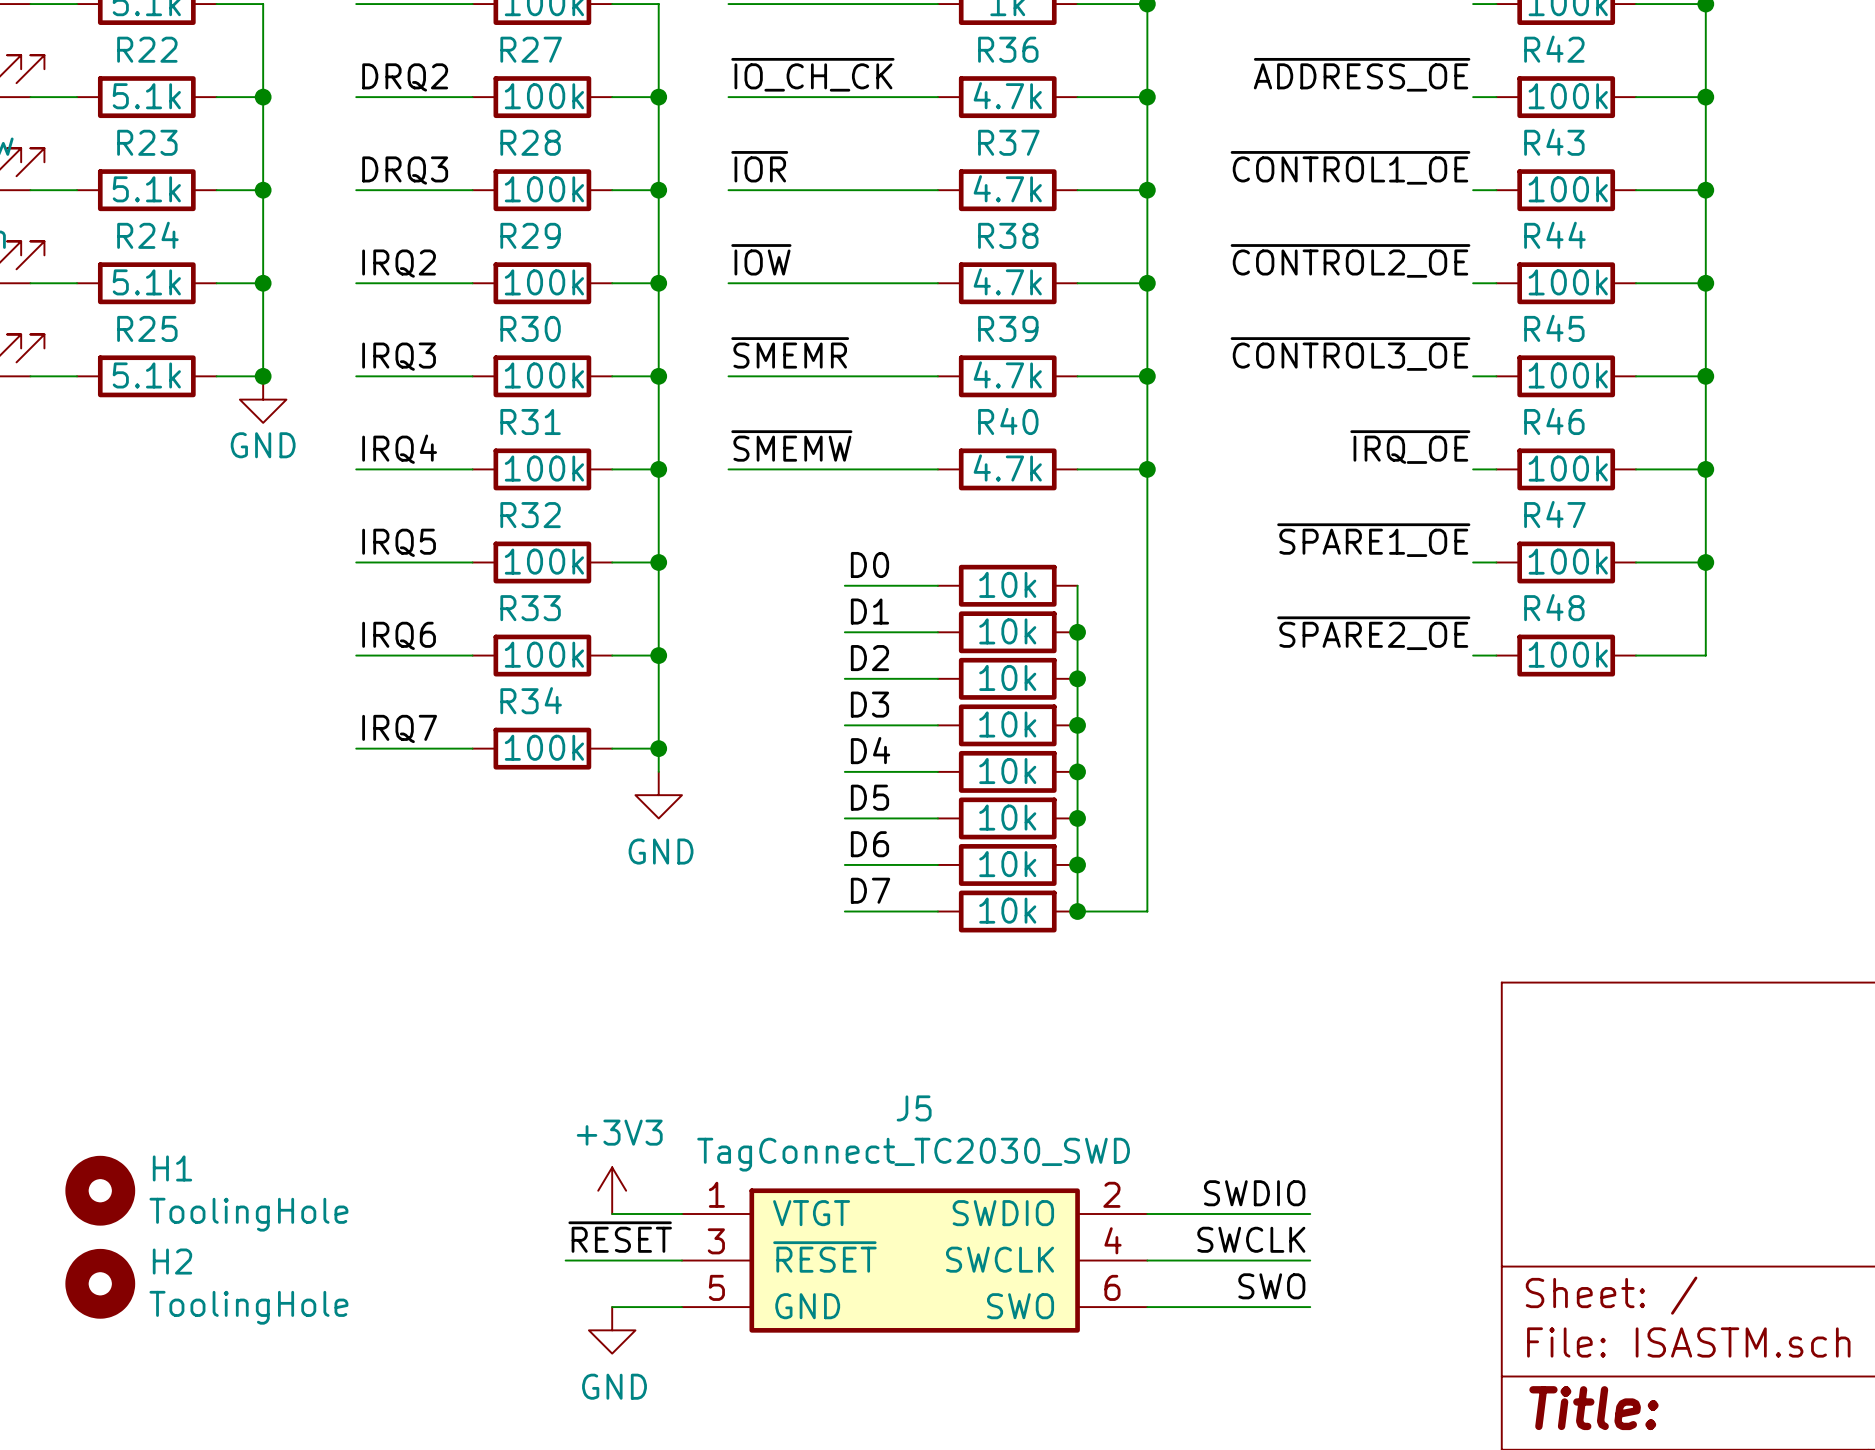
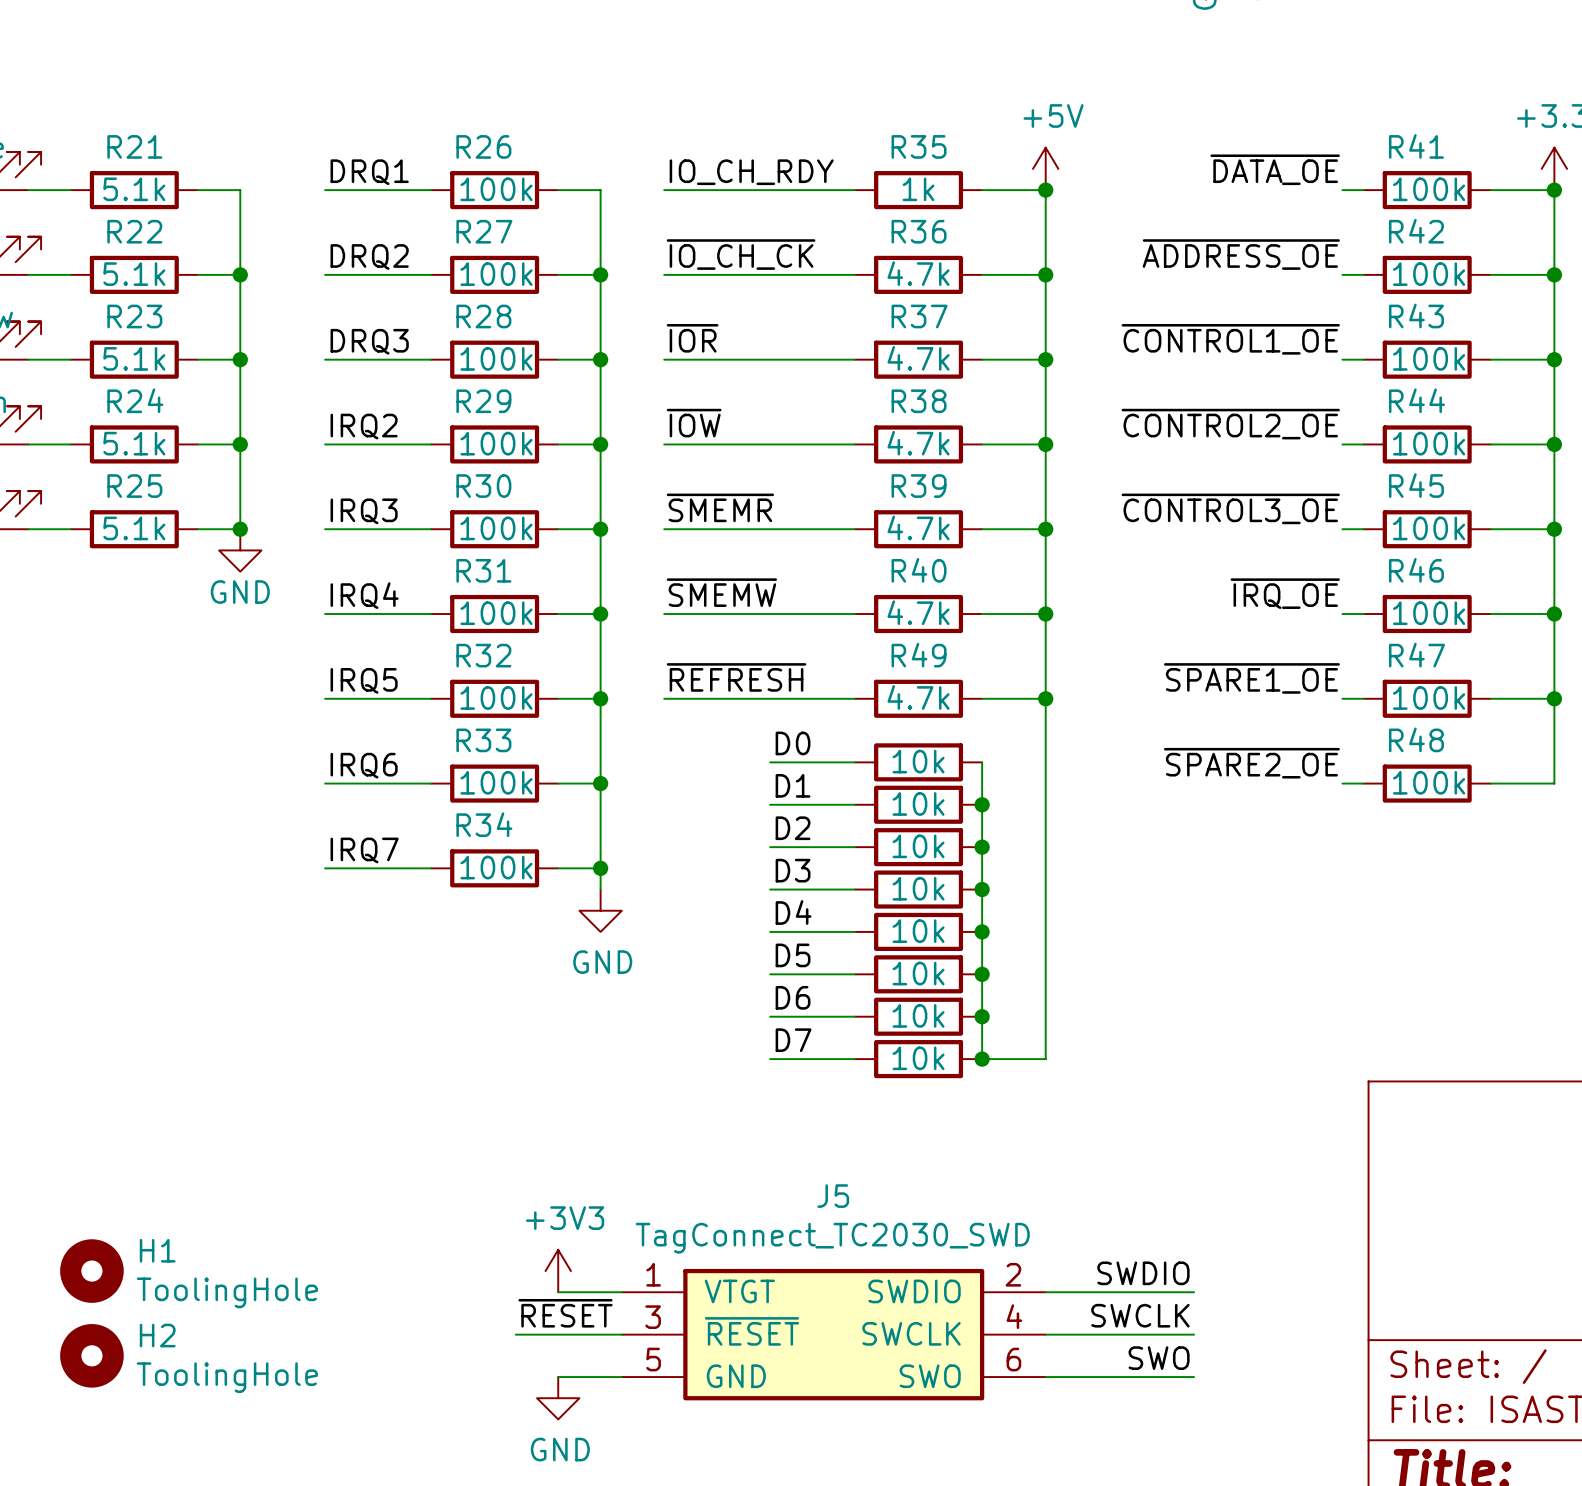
label: none -> ~{REFRESH} (736, 677)
wire: none -> (664, 698) (854, 698)
R49: none -> 4.7k (918, 698)
wire: none -> (982, 698) (1045, 698)
label: D0 (869, 564) -> none
wire: (844, 585) (937, 585) -> (770, 1059) (854, 1059)
part position: (1007, 585) -> (918, 1059)
wire: (1077, 585) (1077, 632) -> none
label: D1 (869, 611) -> D0 (793, 743)
junction position: (1077, 632) -> (1045, 698)
label: D2 (869, 658) -> D1 (793, 785)
label: D3 (869, 704) -> D2 (793, 828)
label: D4 (870, 750) -> D3 (793, 870)
label: D5 (869, 797) -> D4 (793, 912)
label: D6 (869, 844) -> D5 (793, 955)
label: D7 (870, 890) -> D6 (793, 997)
wire: (1077, 911) (1147, 911) -> (982, 1016) (982, 1059) (1045, 1059) (1045, 1016)
label: none -> D7 (793, 1040)
junction: none -> (982, 1059)

